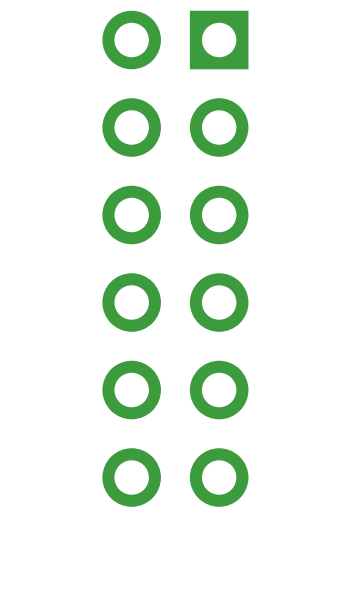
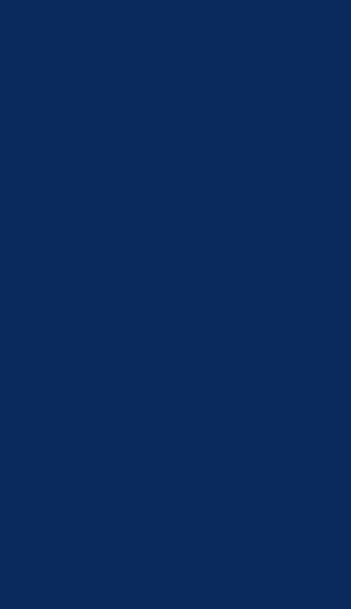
part: (175, 258) -> none

